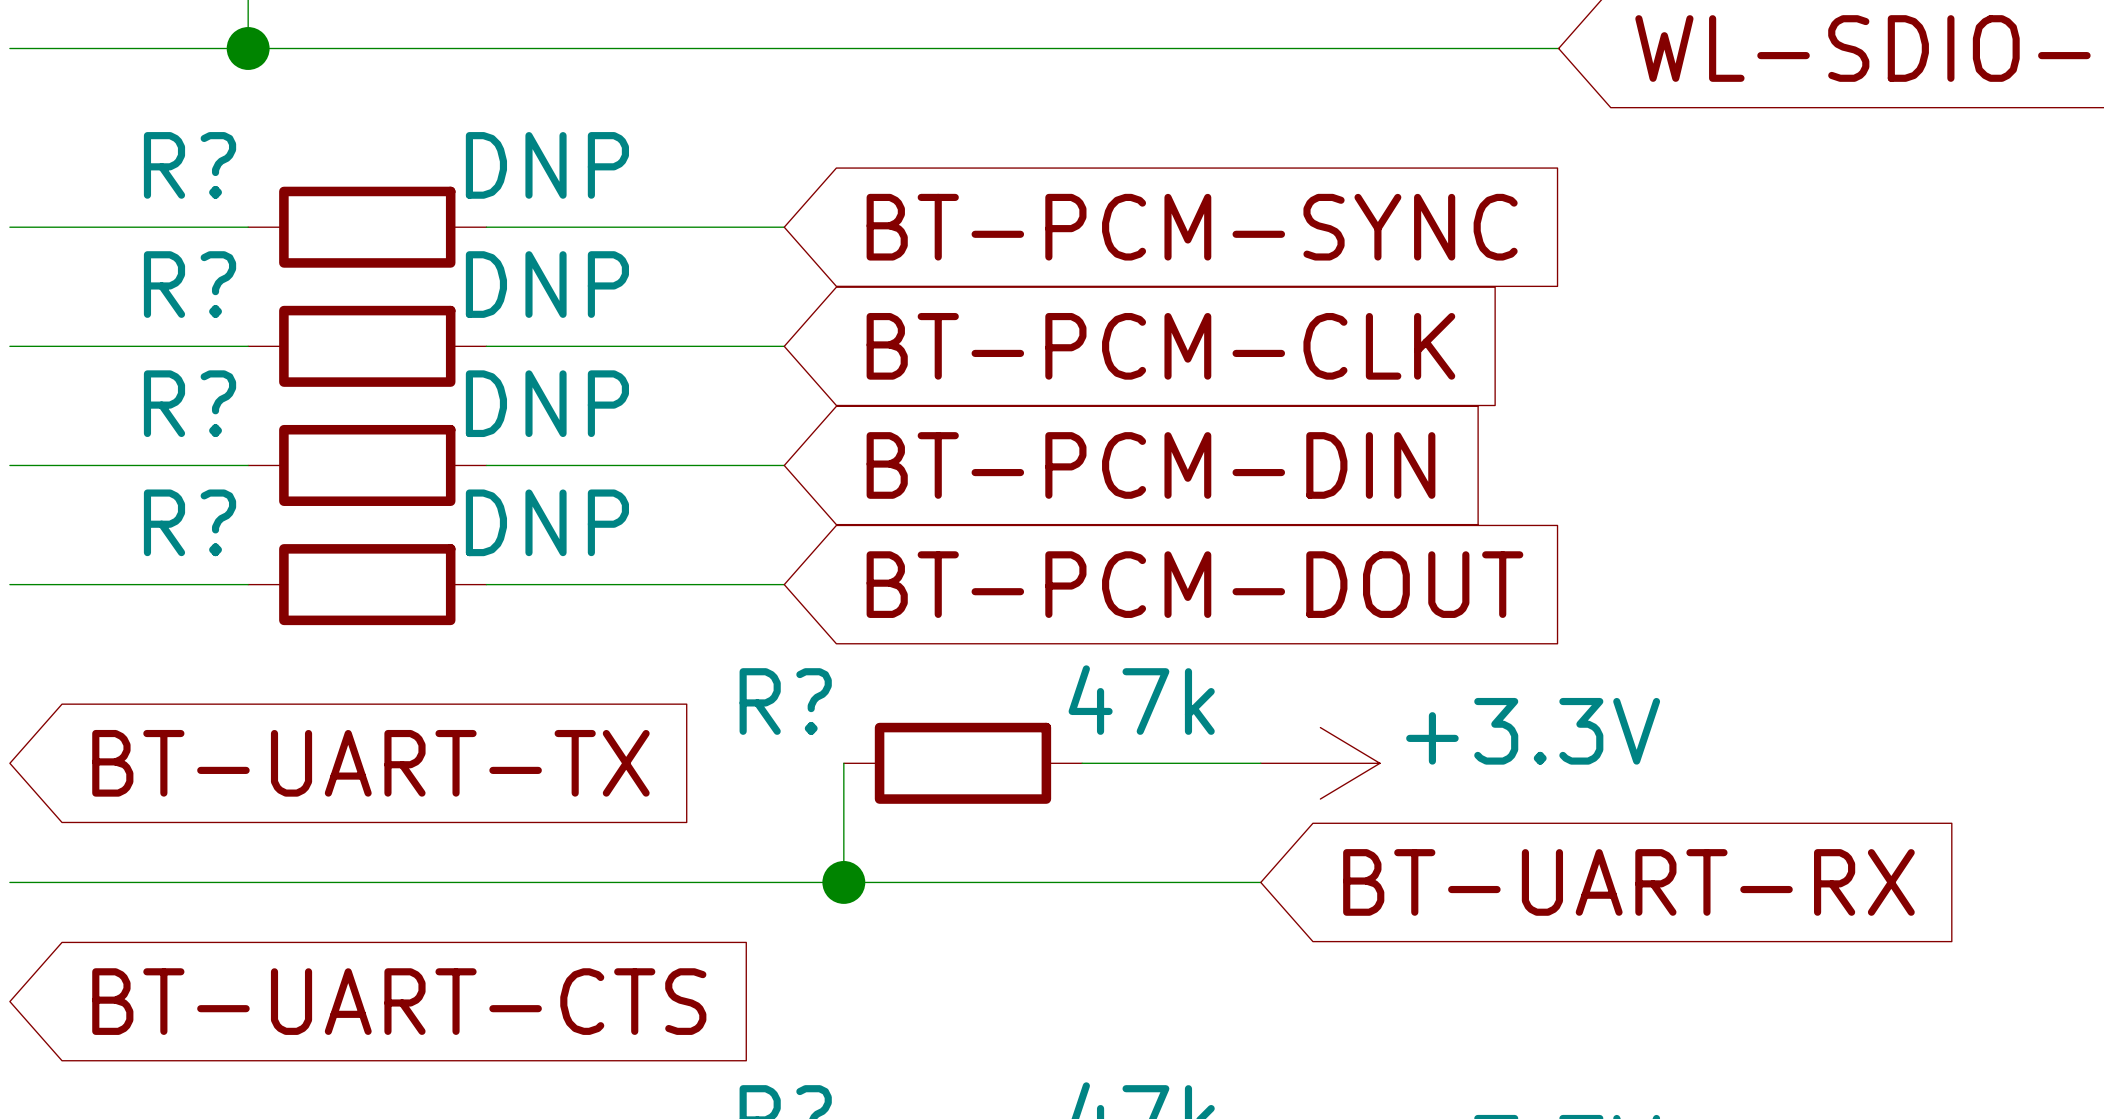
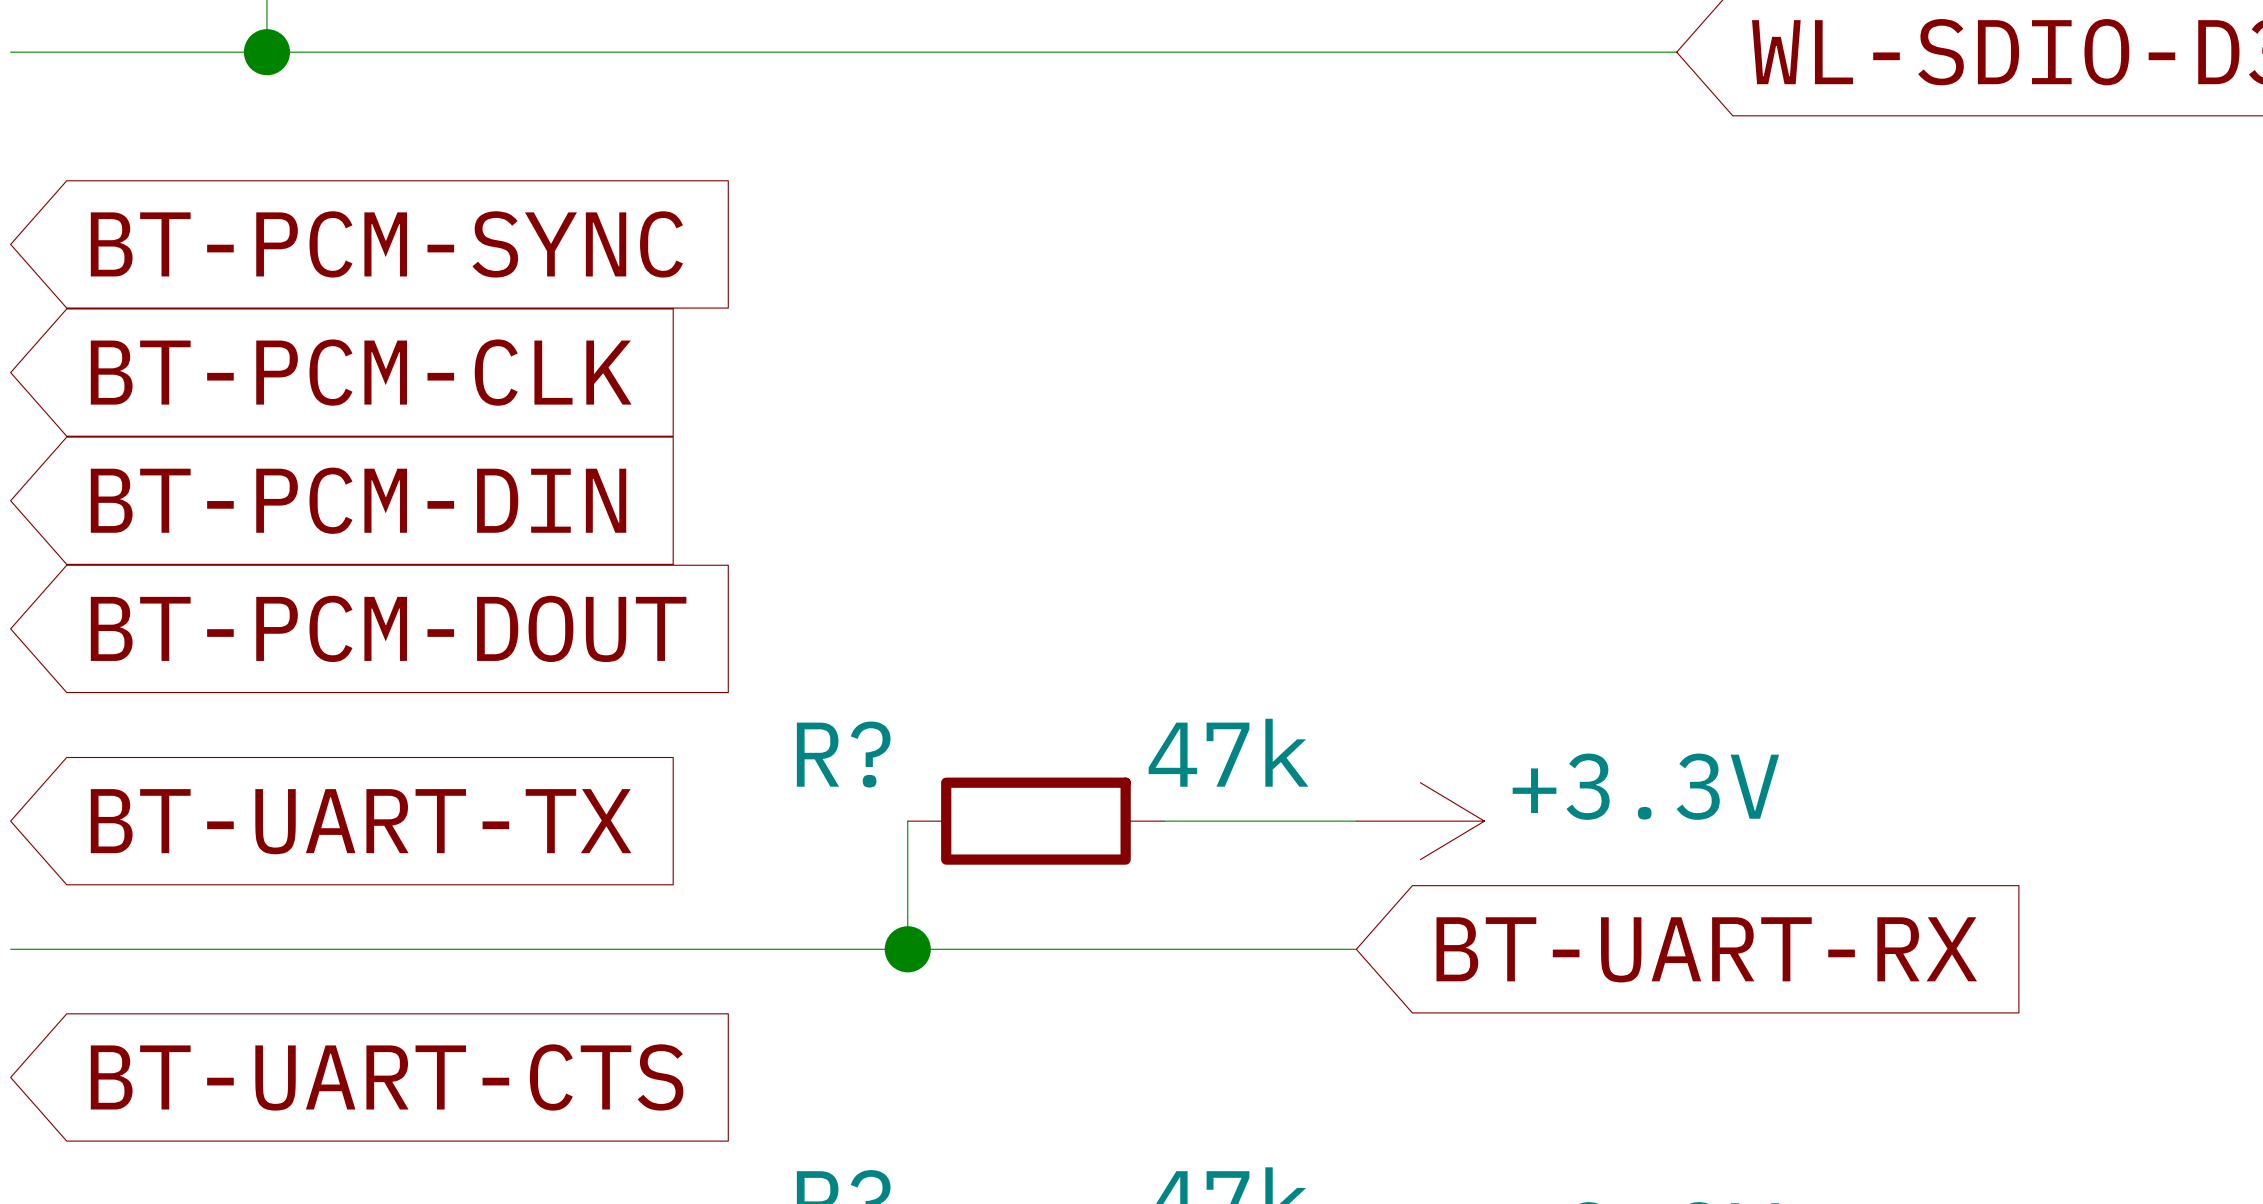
wire: (9, 227) (248, 227) -> none
R?: DNP (367, 227) -> none
wire: (486, 227) (784, 227) -> none
global label position: BT-PCM-SYNC (1192, 227) -> BT-PCM-SYNC (386, 244)
wire: (9, 346) (248, 346) -> none
R?: DNP (367, 346) -> none
wire: (486, 346) (784, 346) -> none
global label position: BT-PCM-CLK (1160, 346) -> BT-PCM-CLK (361, 372)
wire: (9, 465) (248, 465) -> none
R?: DNP (367, 465) -> none
wire: (486, 465) (784, 465) -> none
global label position: BT-PCM-DIN (1150, 465) -> BT-PCM-DIN (358, 500)
wire: (9, 584) (248, 584) -> none
R?: DNP (367, 584) -> none
wire: (486, 584) (784, 584) -> none
global label position: BT-PCM-DOUT (1194, 584) -> BT-PCM-DOUT (388, 628)

